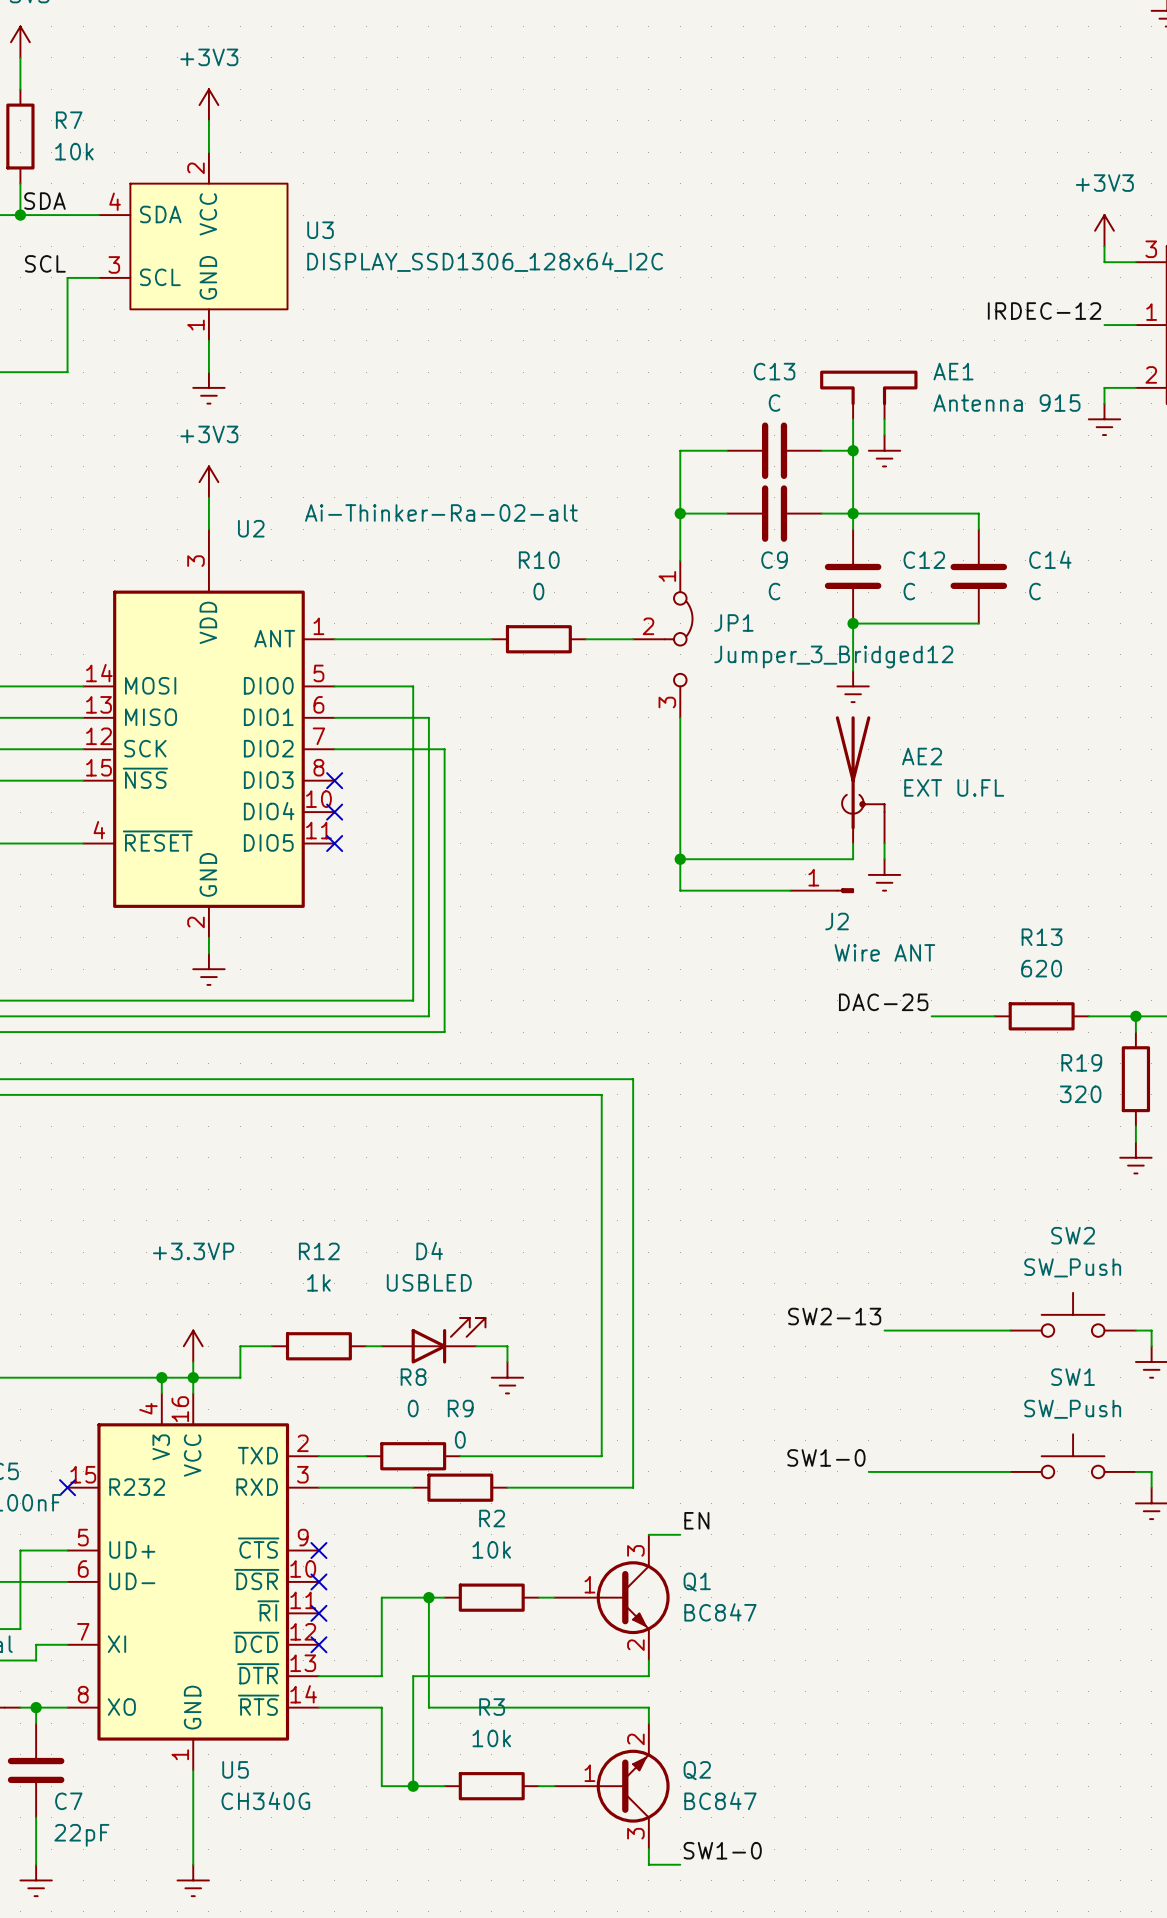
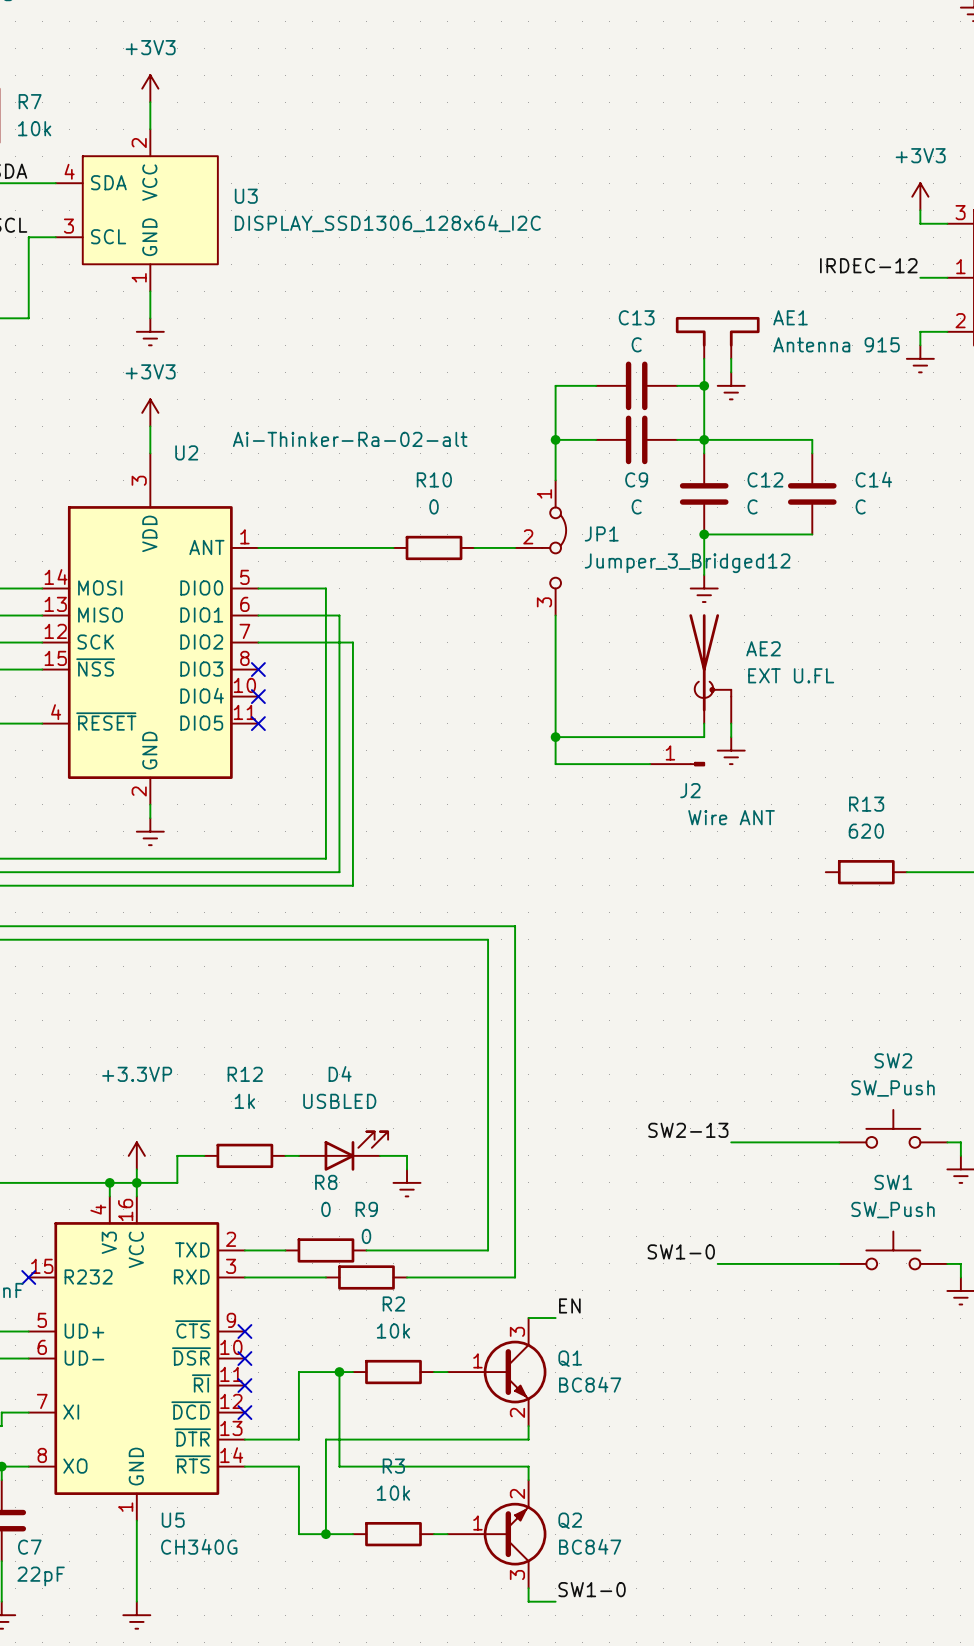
label: DAC-25 (883, 1002) -> none
wire: (931, 1016) (994, 1016) -> none
wire: (1135, 1016) (1135, 1032) -> none
junction: (1135, 1016) -> none
R19: 320 (1135, 1079) -> none
wire: (1135, 1126) (1135, 1142) -> none
power symbol: (1135, 1157) -> none

